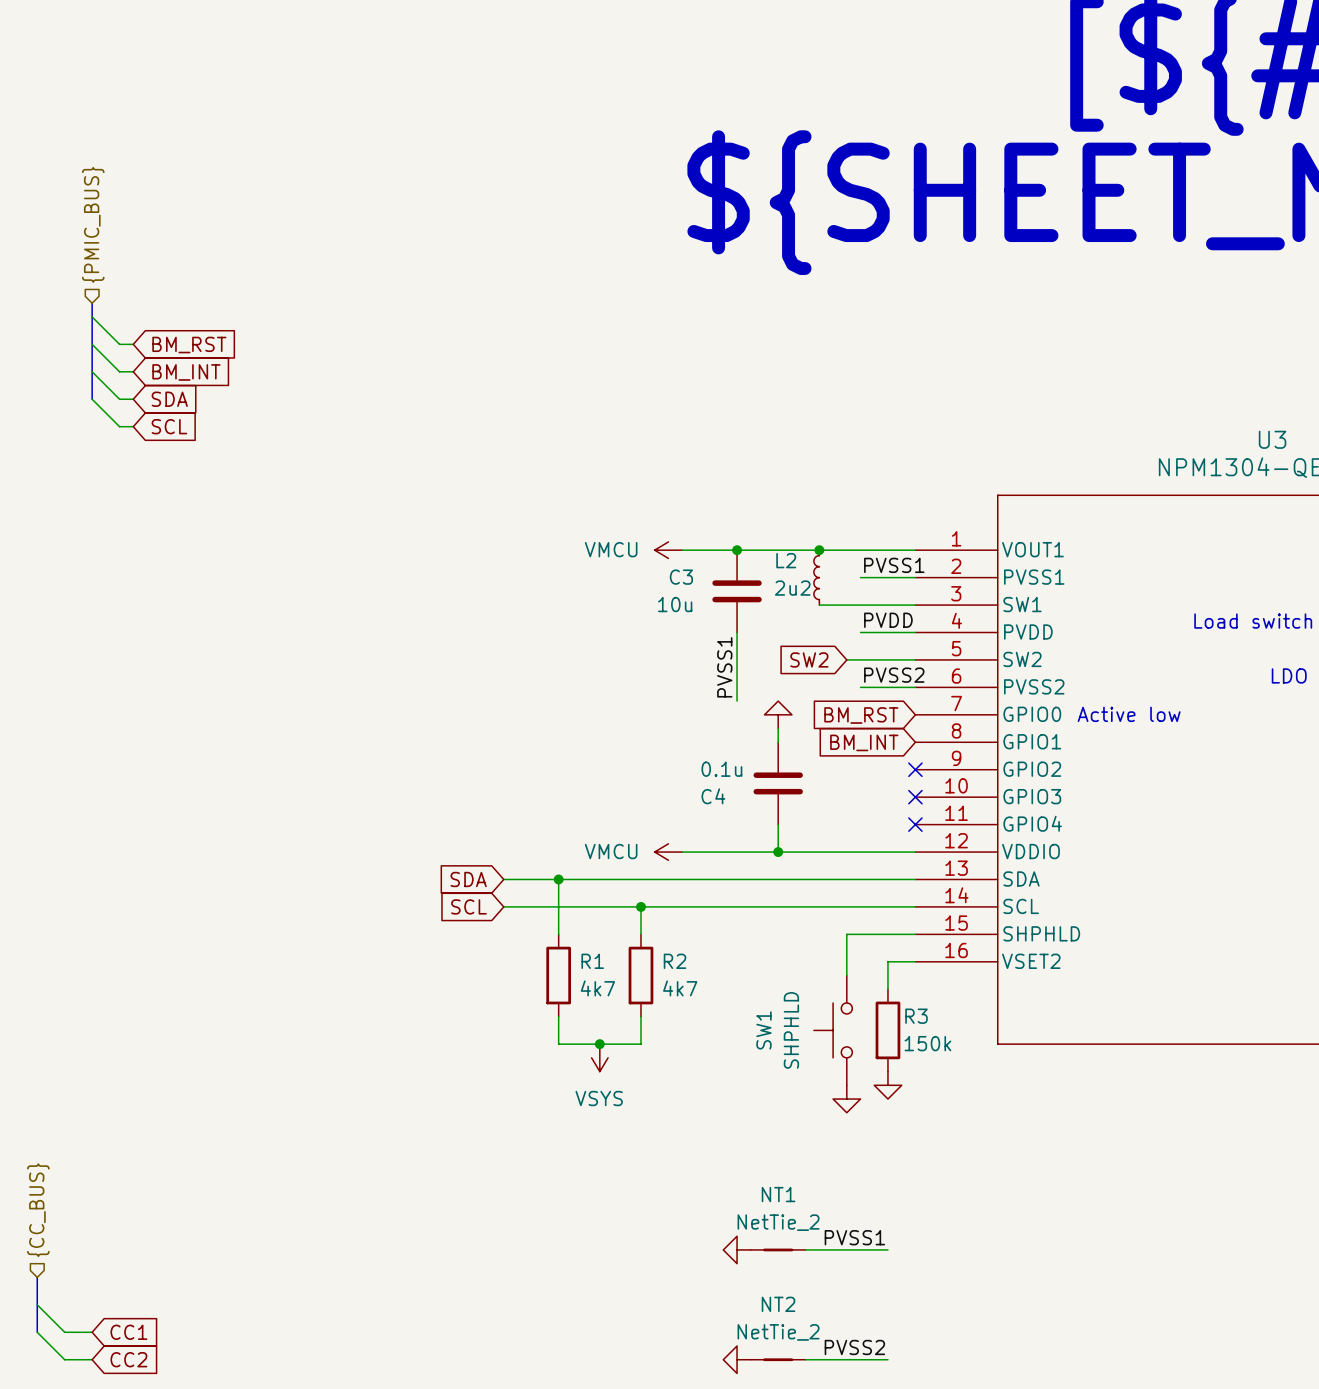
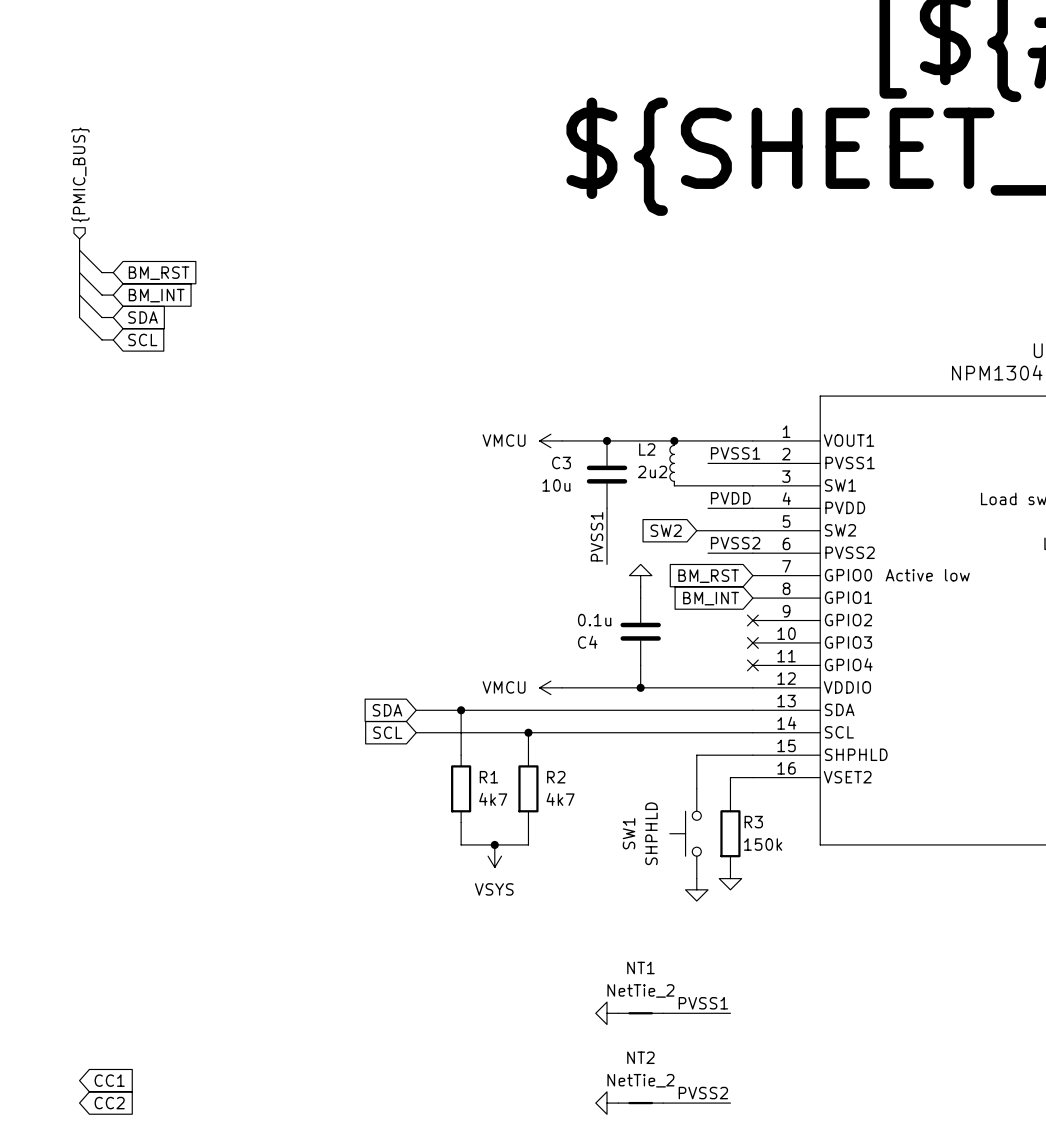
hierarchical label: {CC_BUS} (38, 1210) -> none
bus: (37, 1277) (37, 1332) -> none
wire: (37, 1304) (64, 1332) (92, 1332) -> none
wire: (37, 1332) (64, 1359) (92, 1359) -> none

